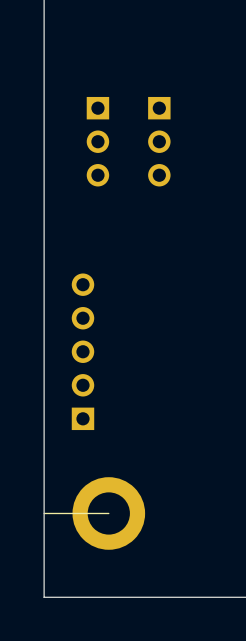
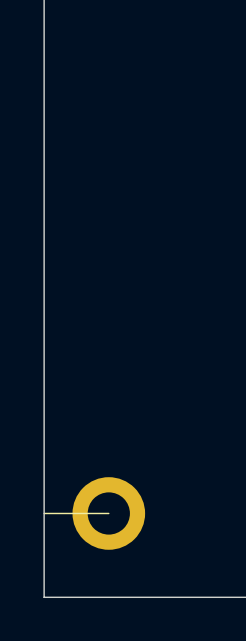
part: (97, 141) -> none
part: (159, 141) -> none
part: (82, 351) -> none

